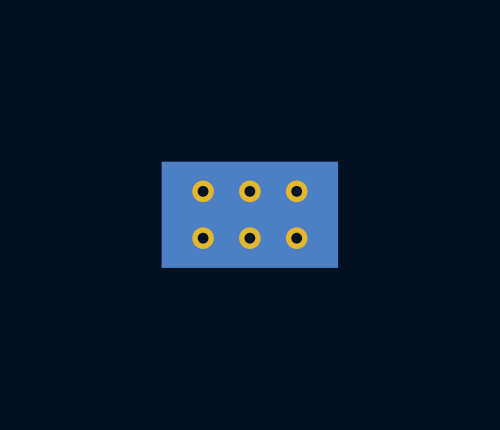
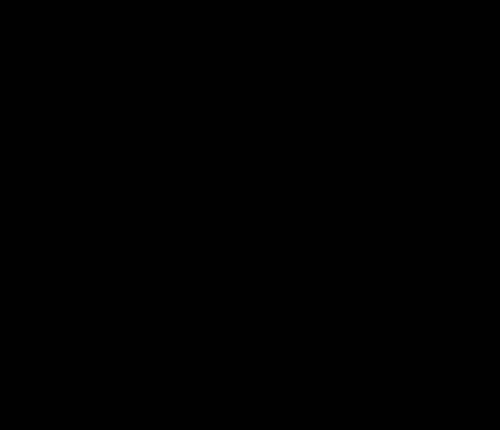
part: (249, 214) -> none

